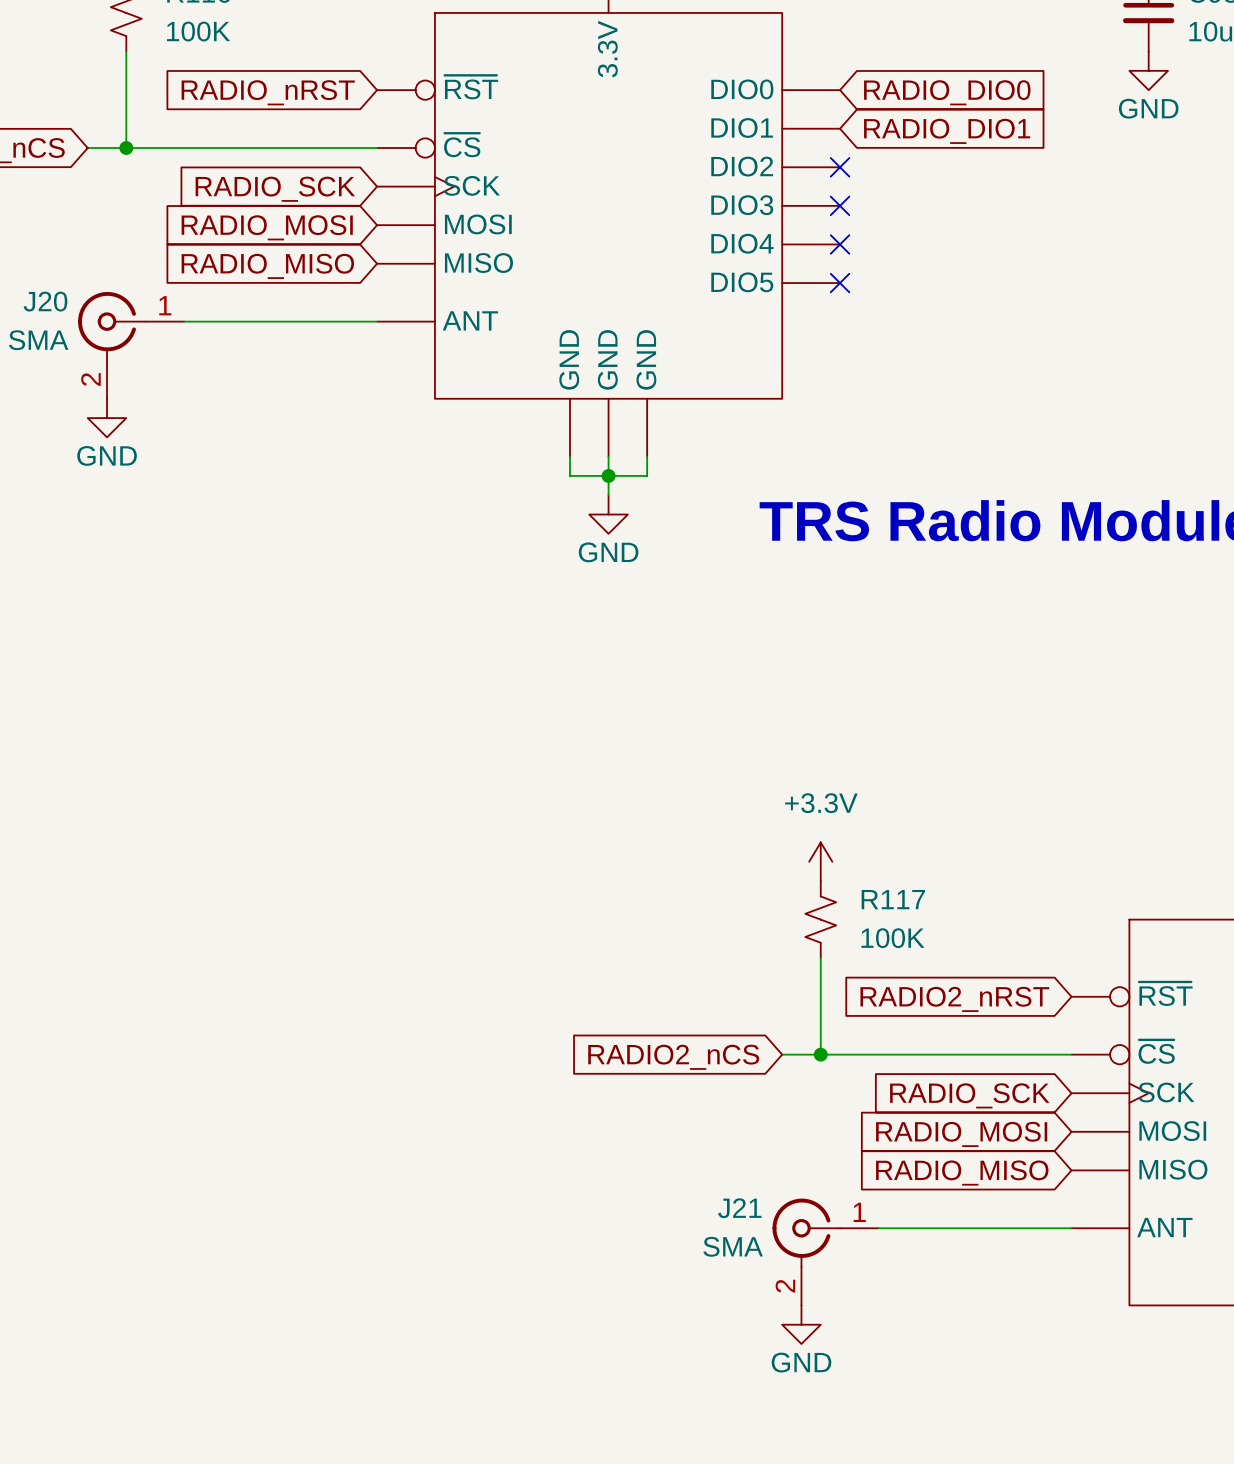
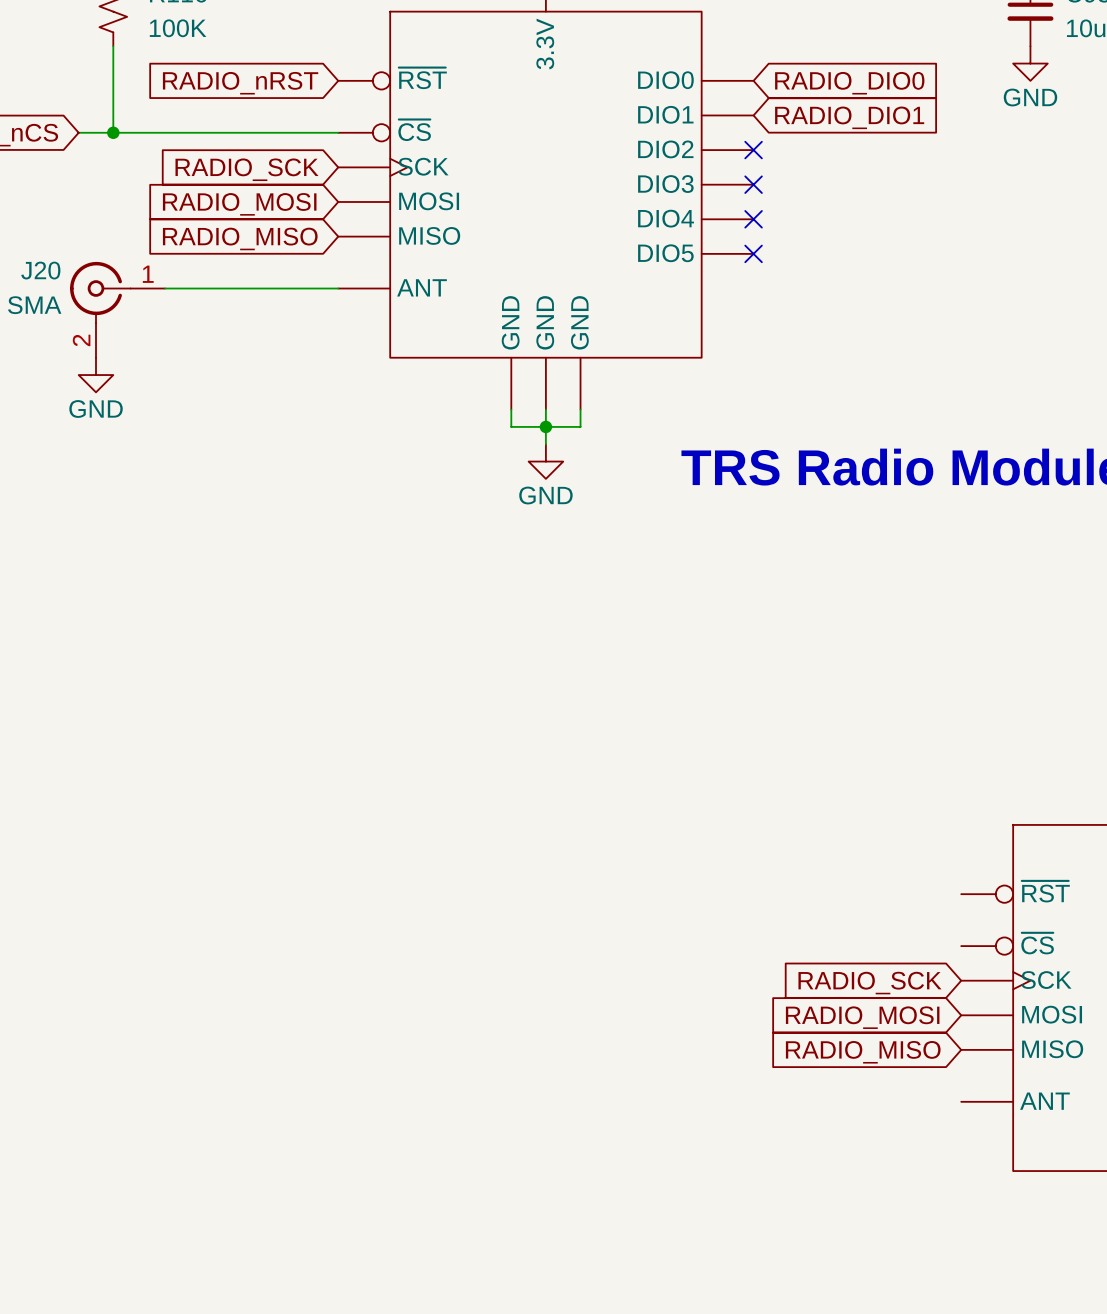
power symbol: +3.3V (820, 861) -> none
R117: 100K (820, 919) -> none
wire: (820, 958) (820, 1054) -> none
global label: RADIO2_nRST (954, 999) -> none
wire: (782, 1054) (1071, 1054) -> none
junction: (820, 1054) -> none
global label: RADIO2_nCS (673, 1057) -> none
wire: (878, 1228) (1071, 1228) -> none
J21: SMA (825, 1252) -> none
power symbol: GND (801, 1324) -> none

